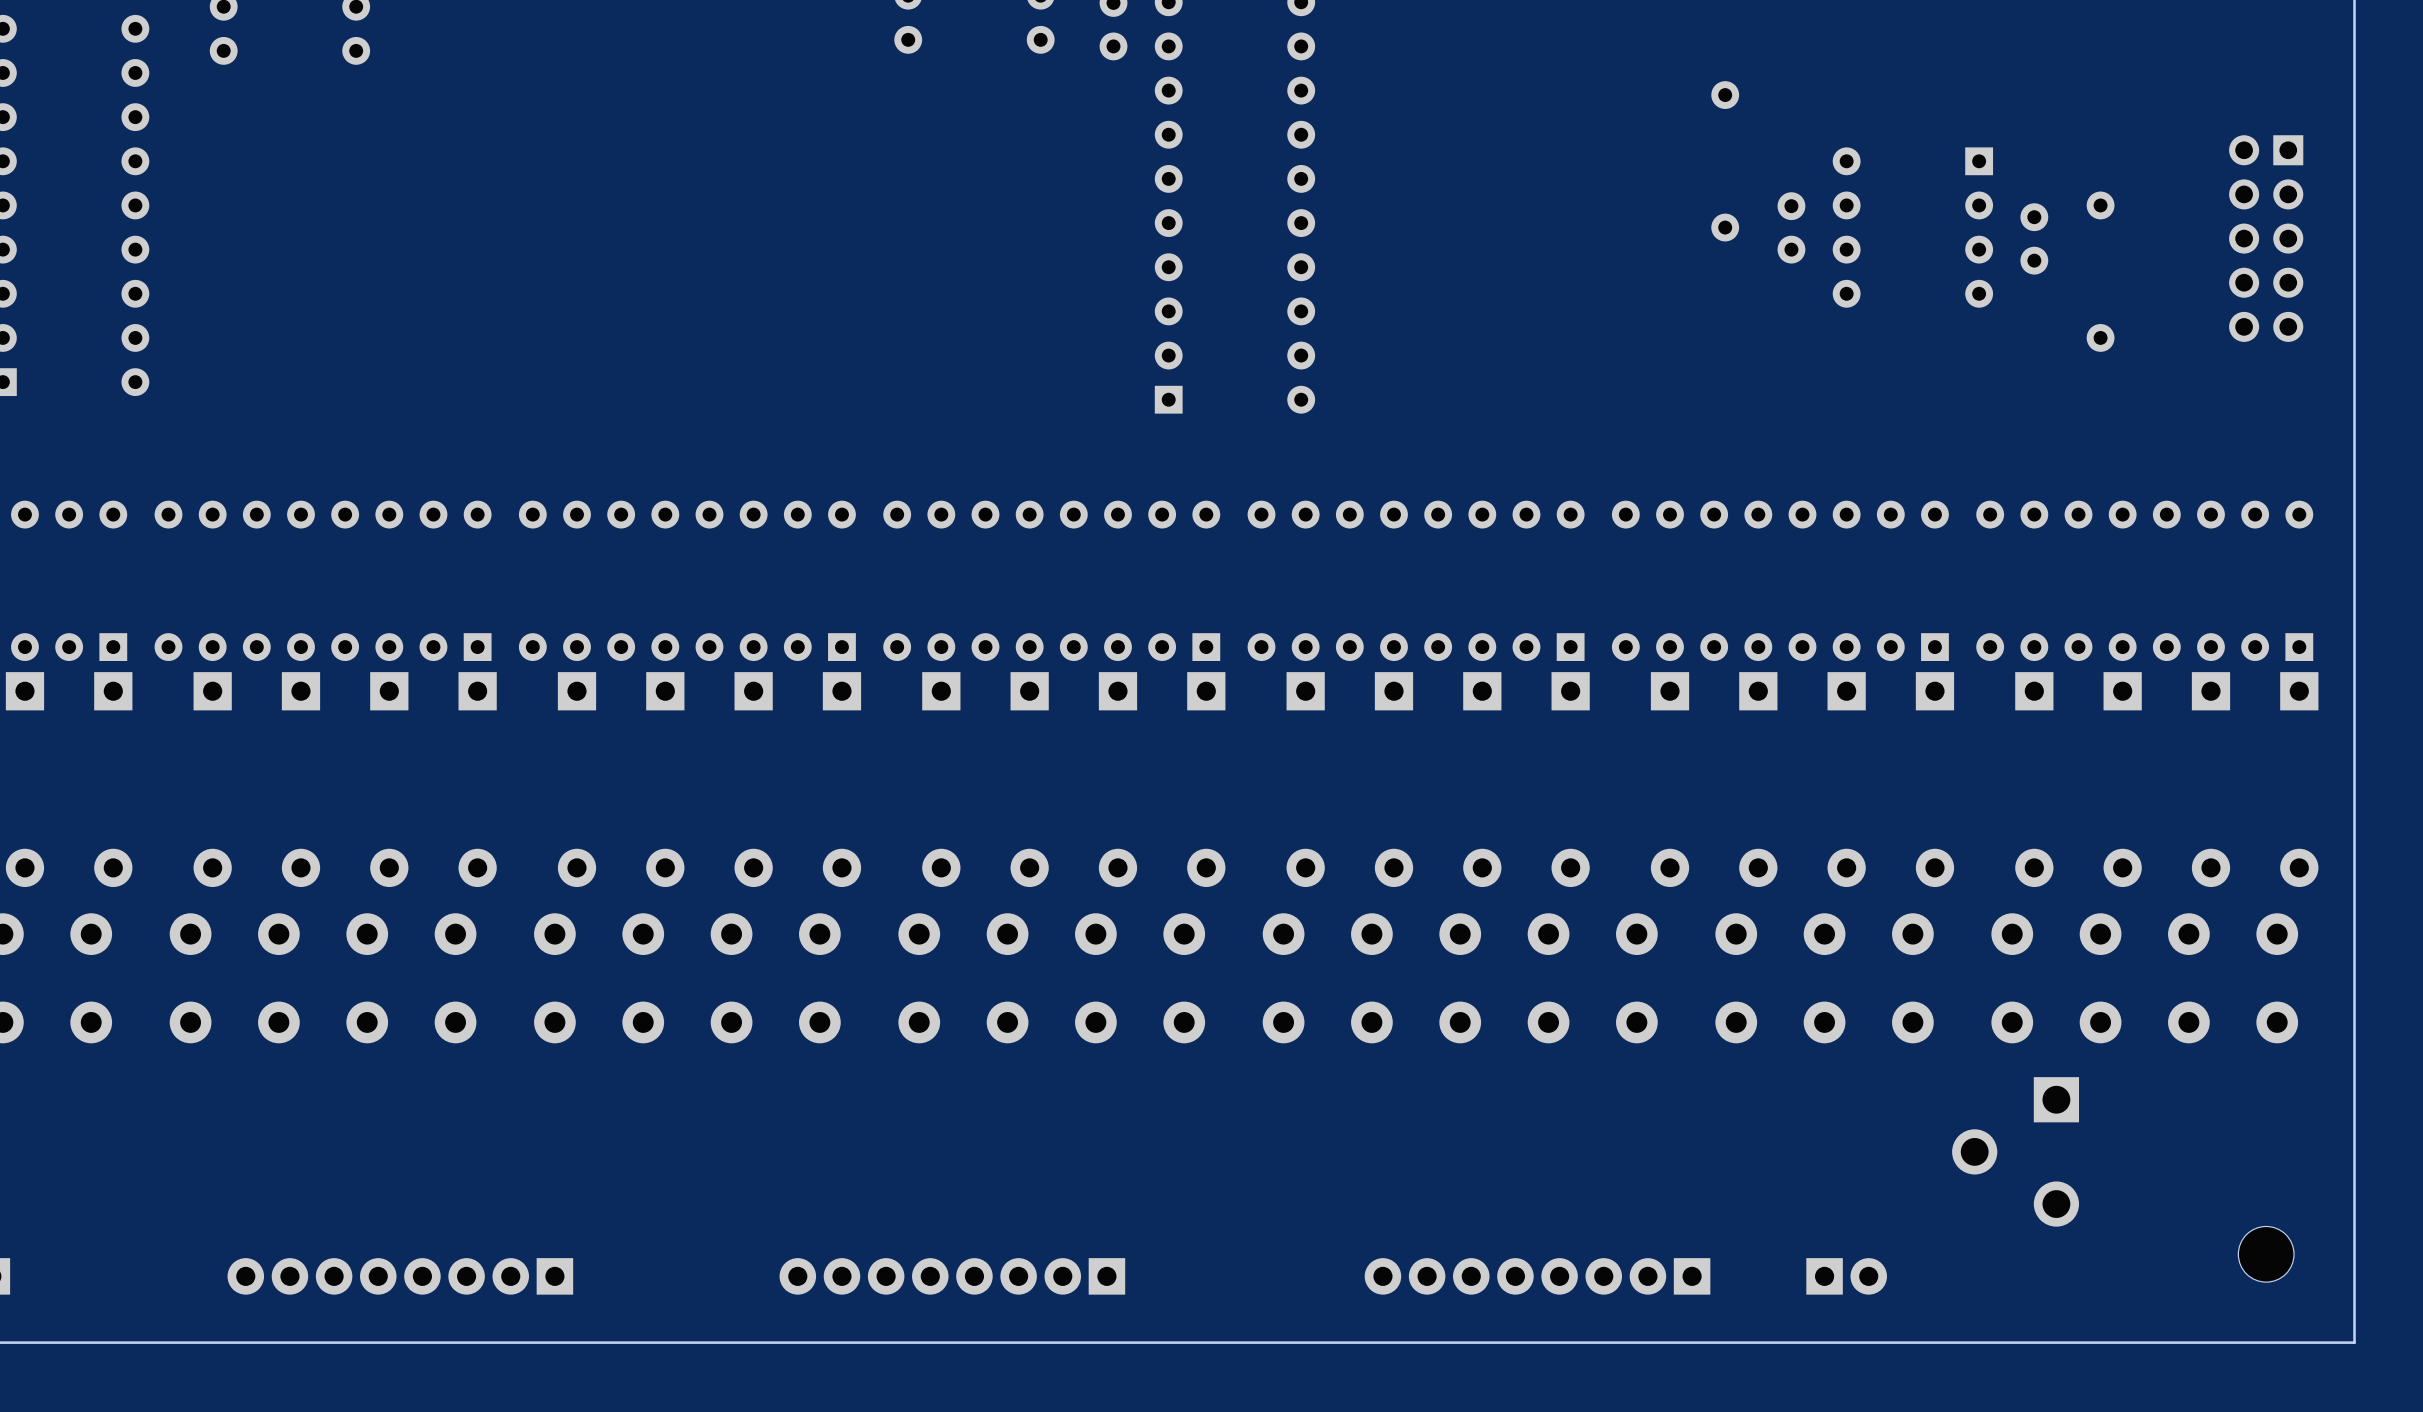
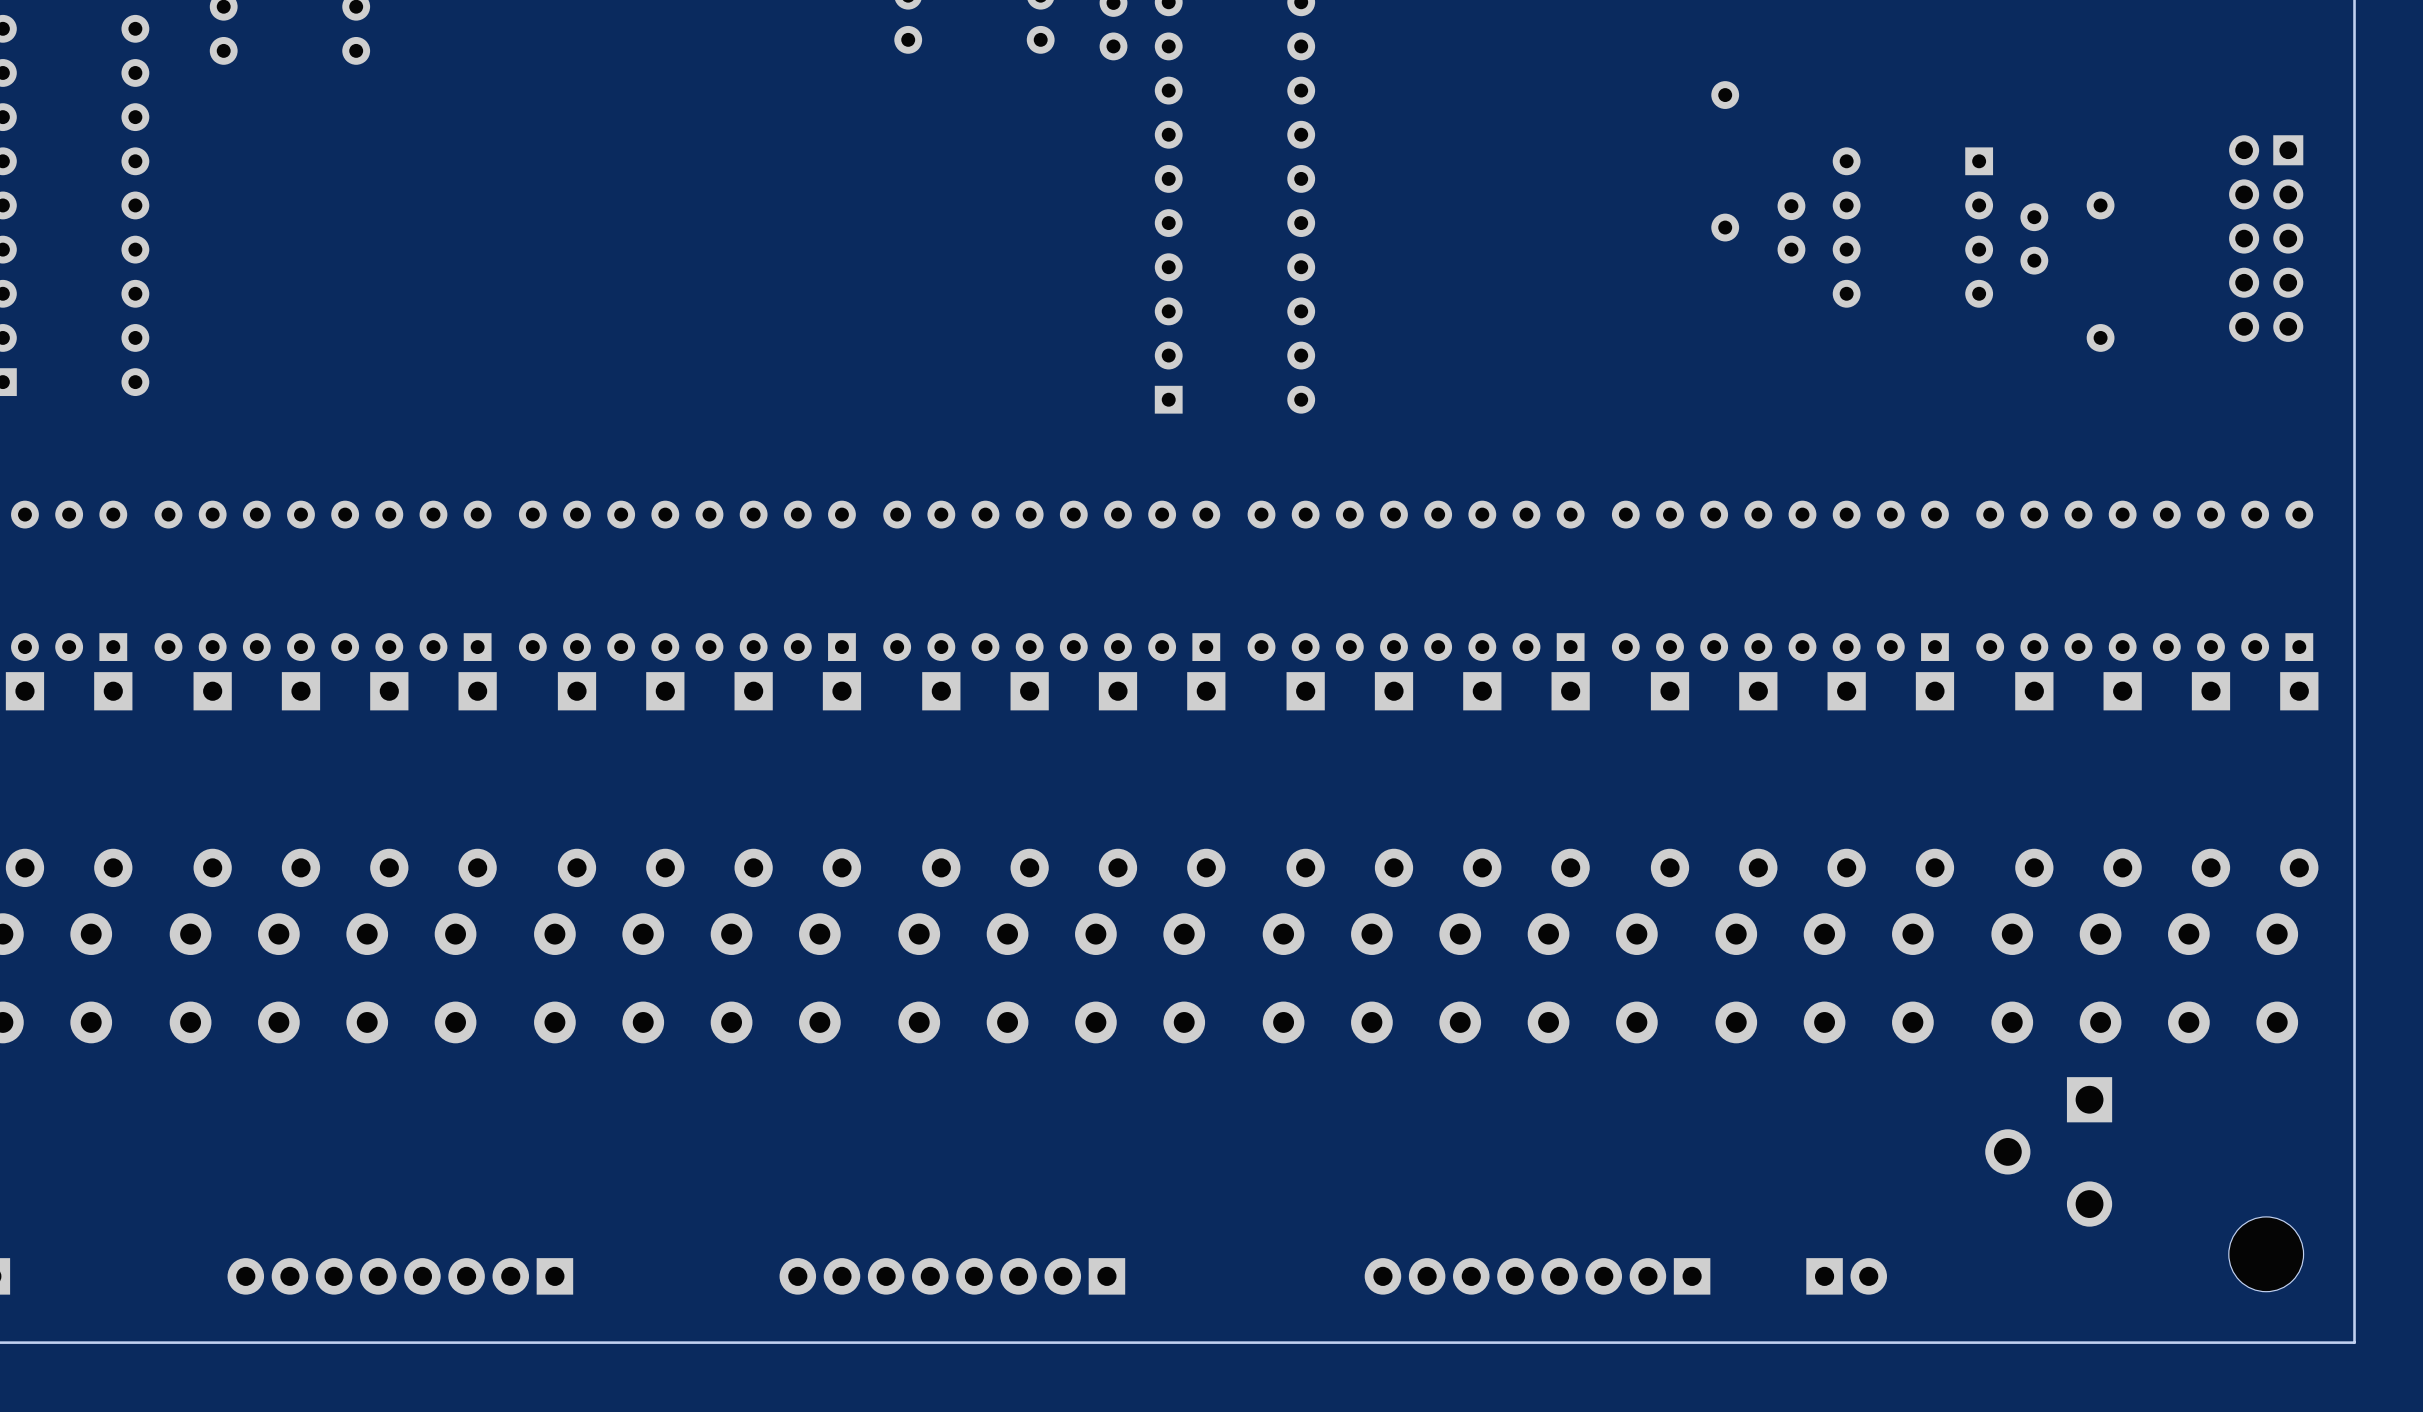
part position: (2015, 1151) -> (2048, 1151)
part footprint: [2238, 1226, 2295, 1283] -> [2228, 1216, 2304, 1292]

